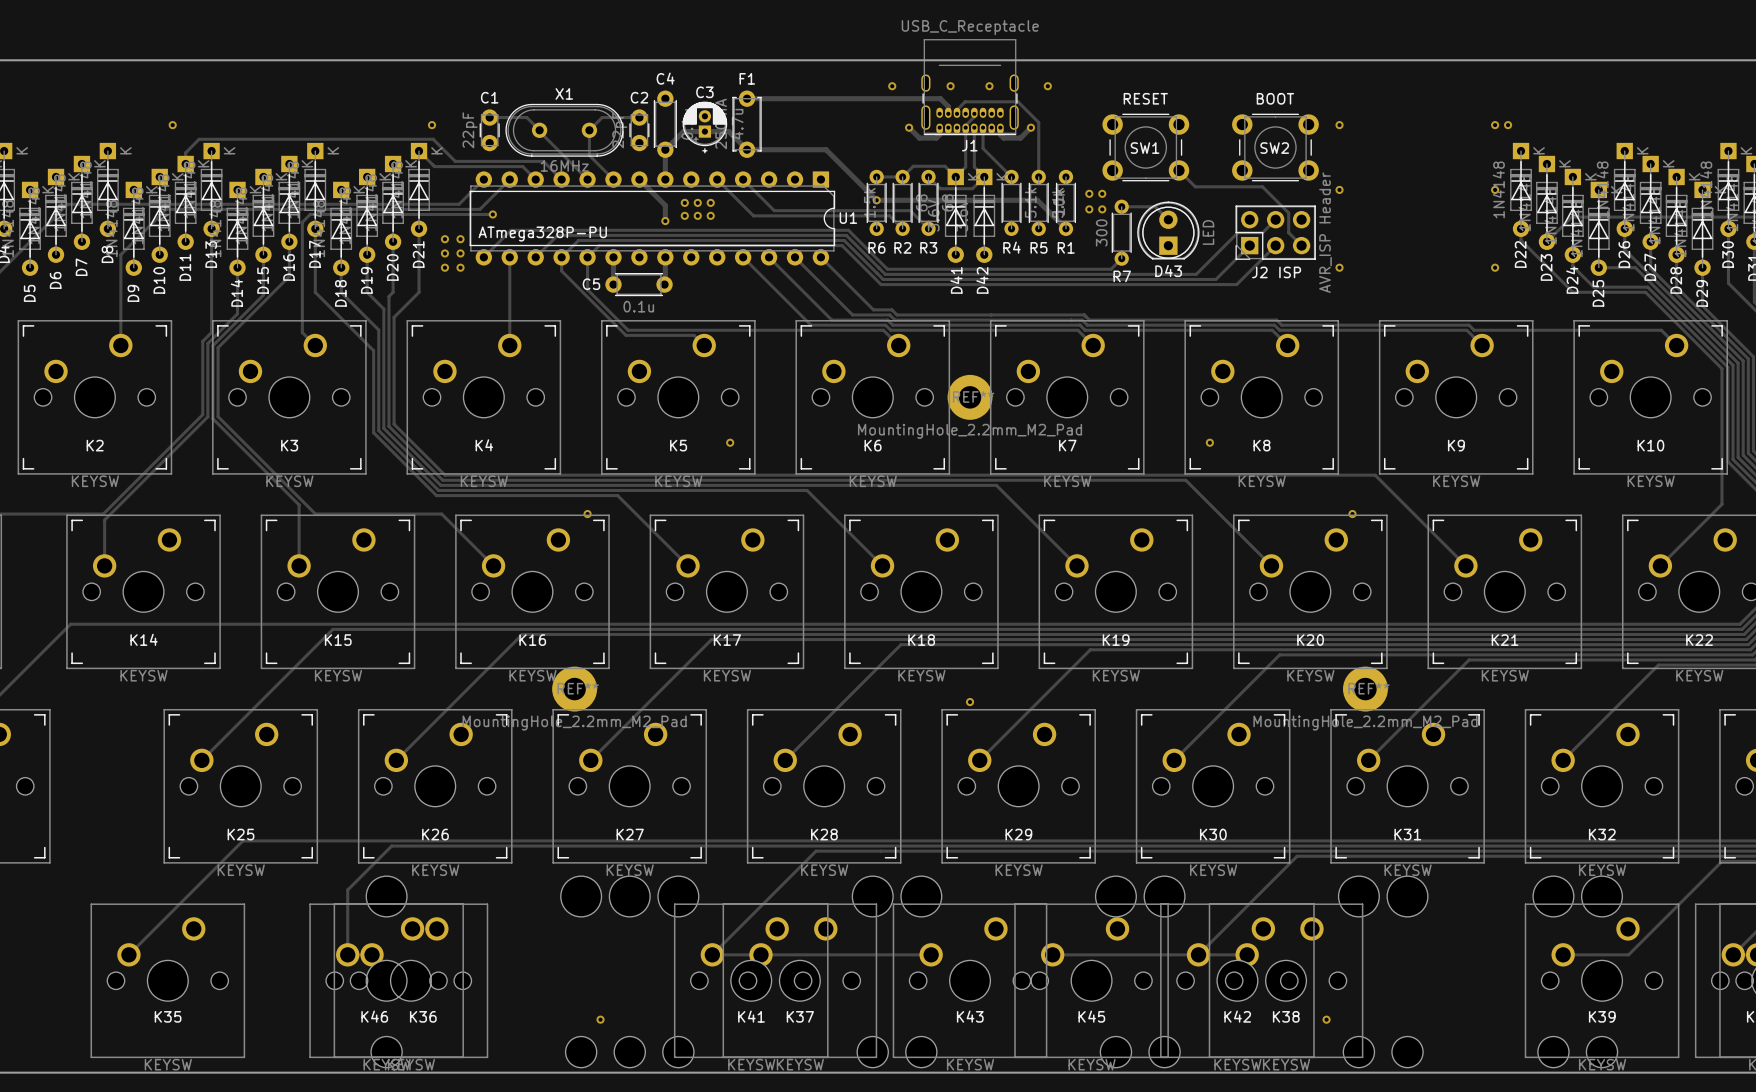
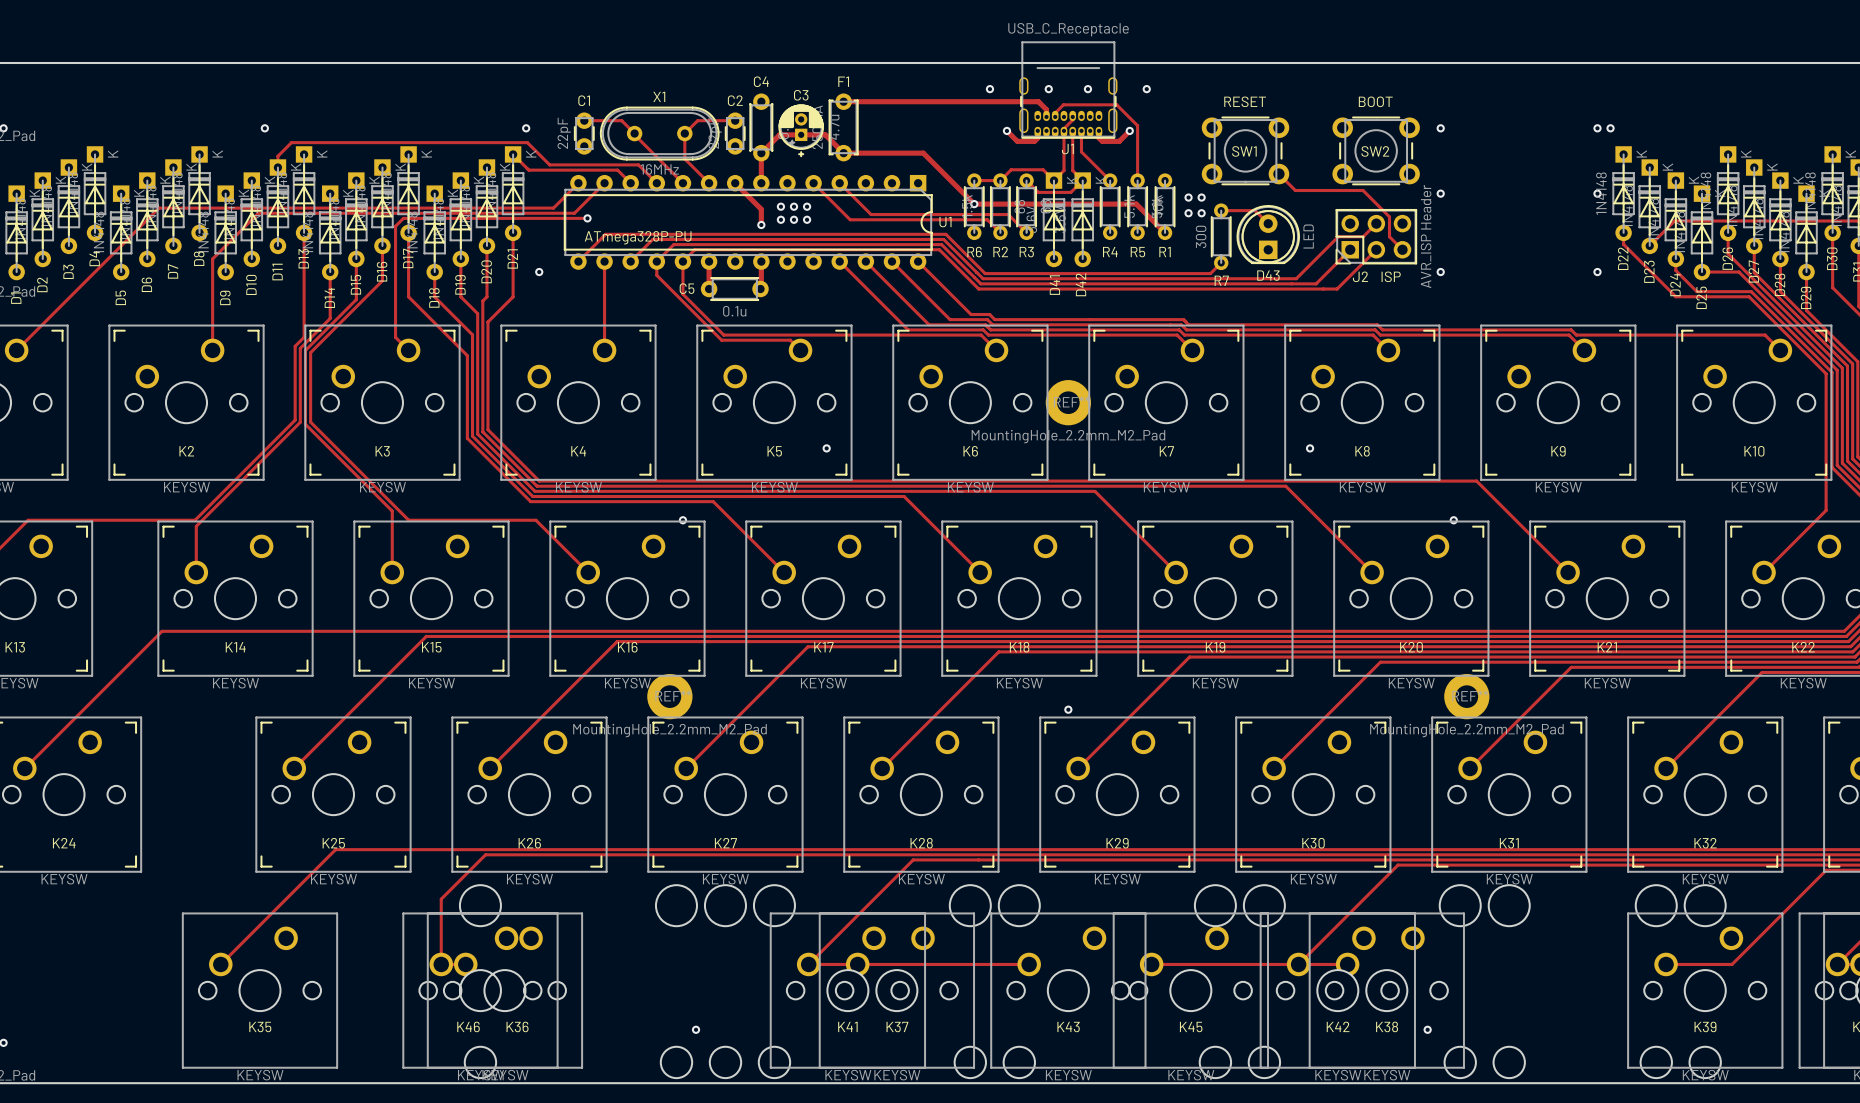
via: (444, 239) -> none
via: (460, 239) -> none
via: (444, 253) -> none
via: (460, 253) -> none
via: (460, 267) -> none

